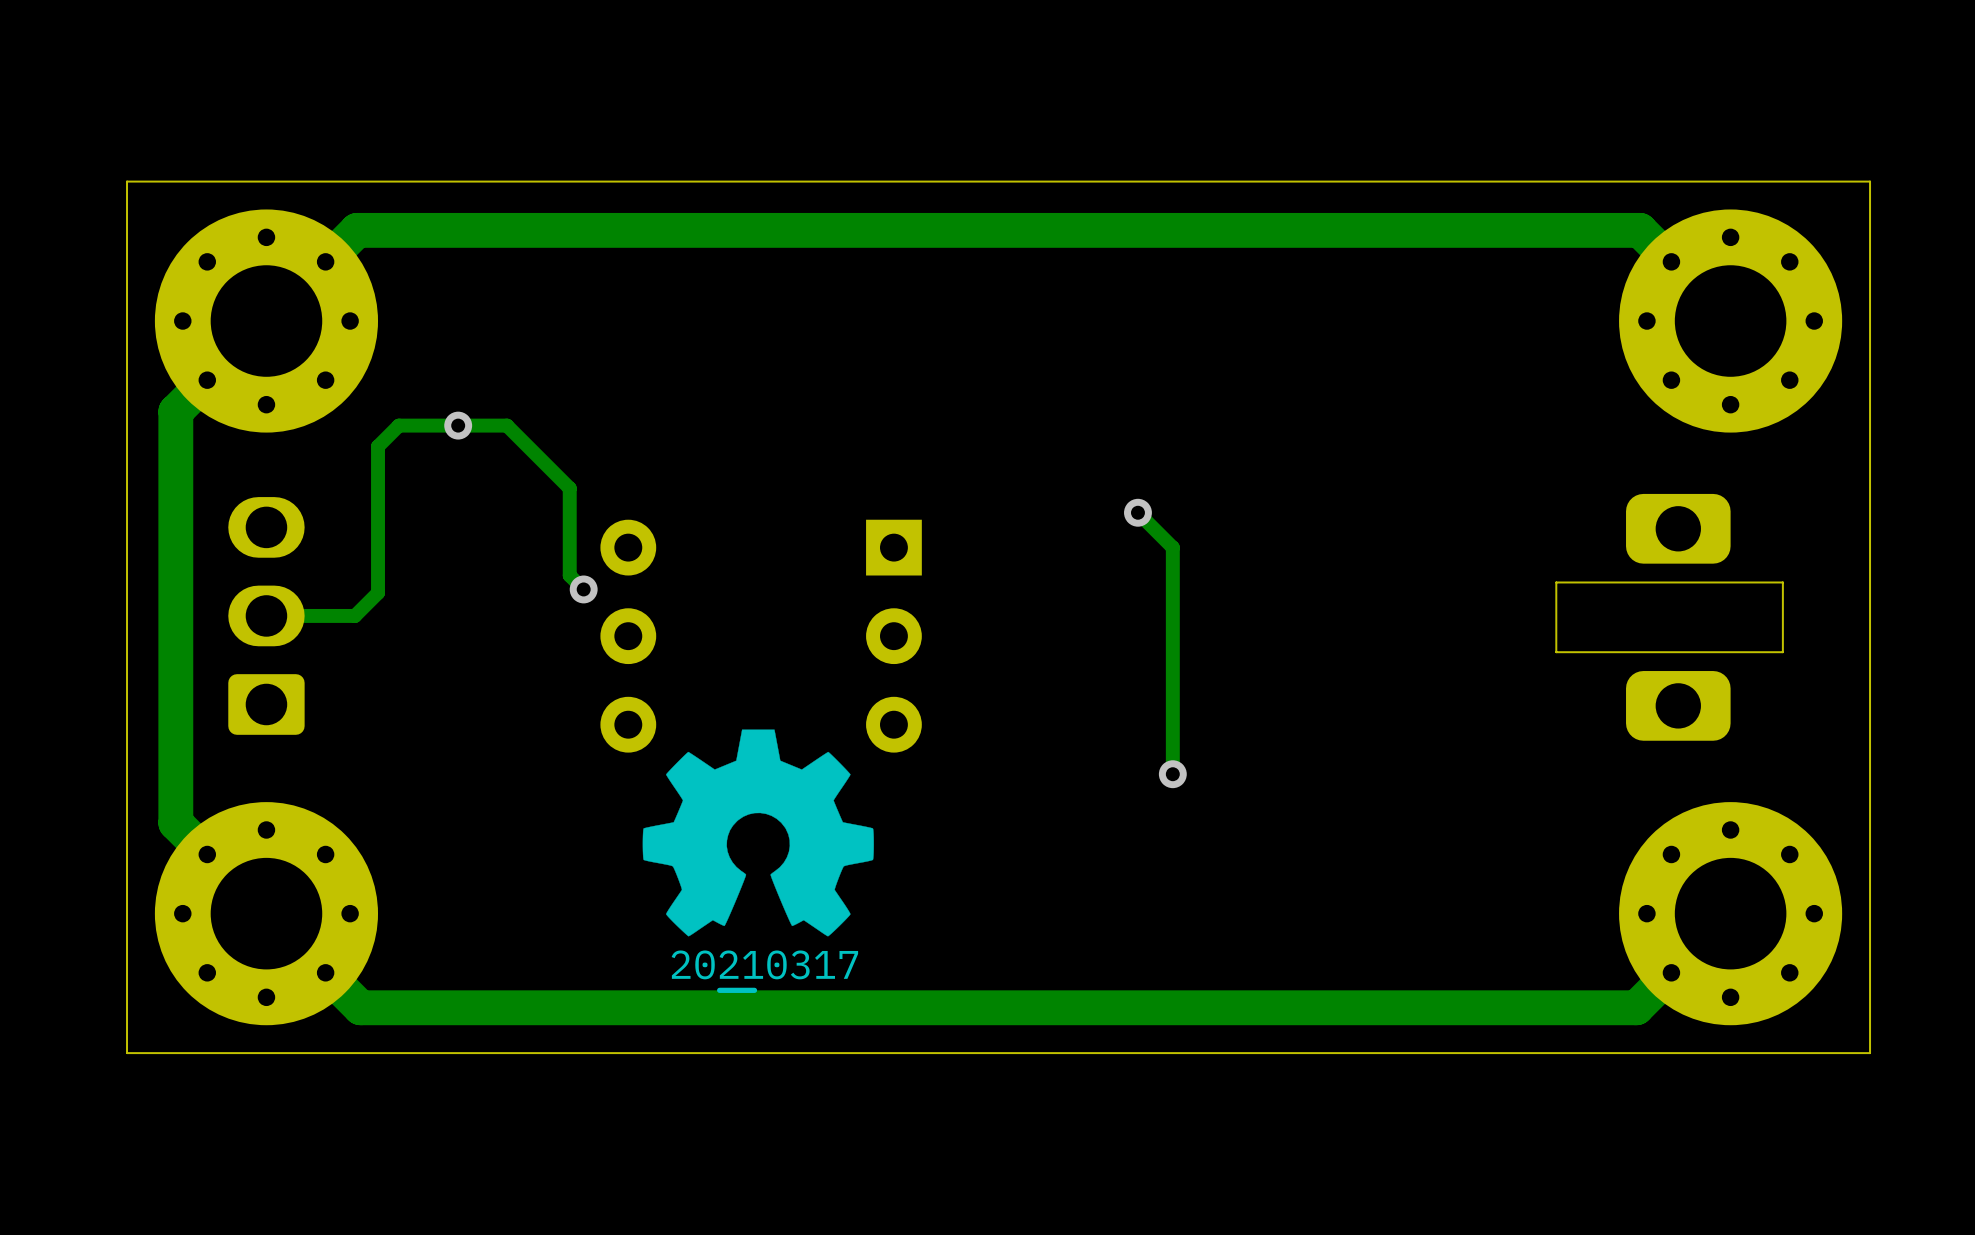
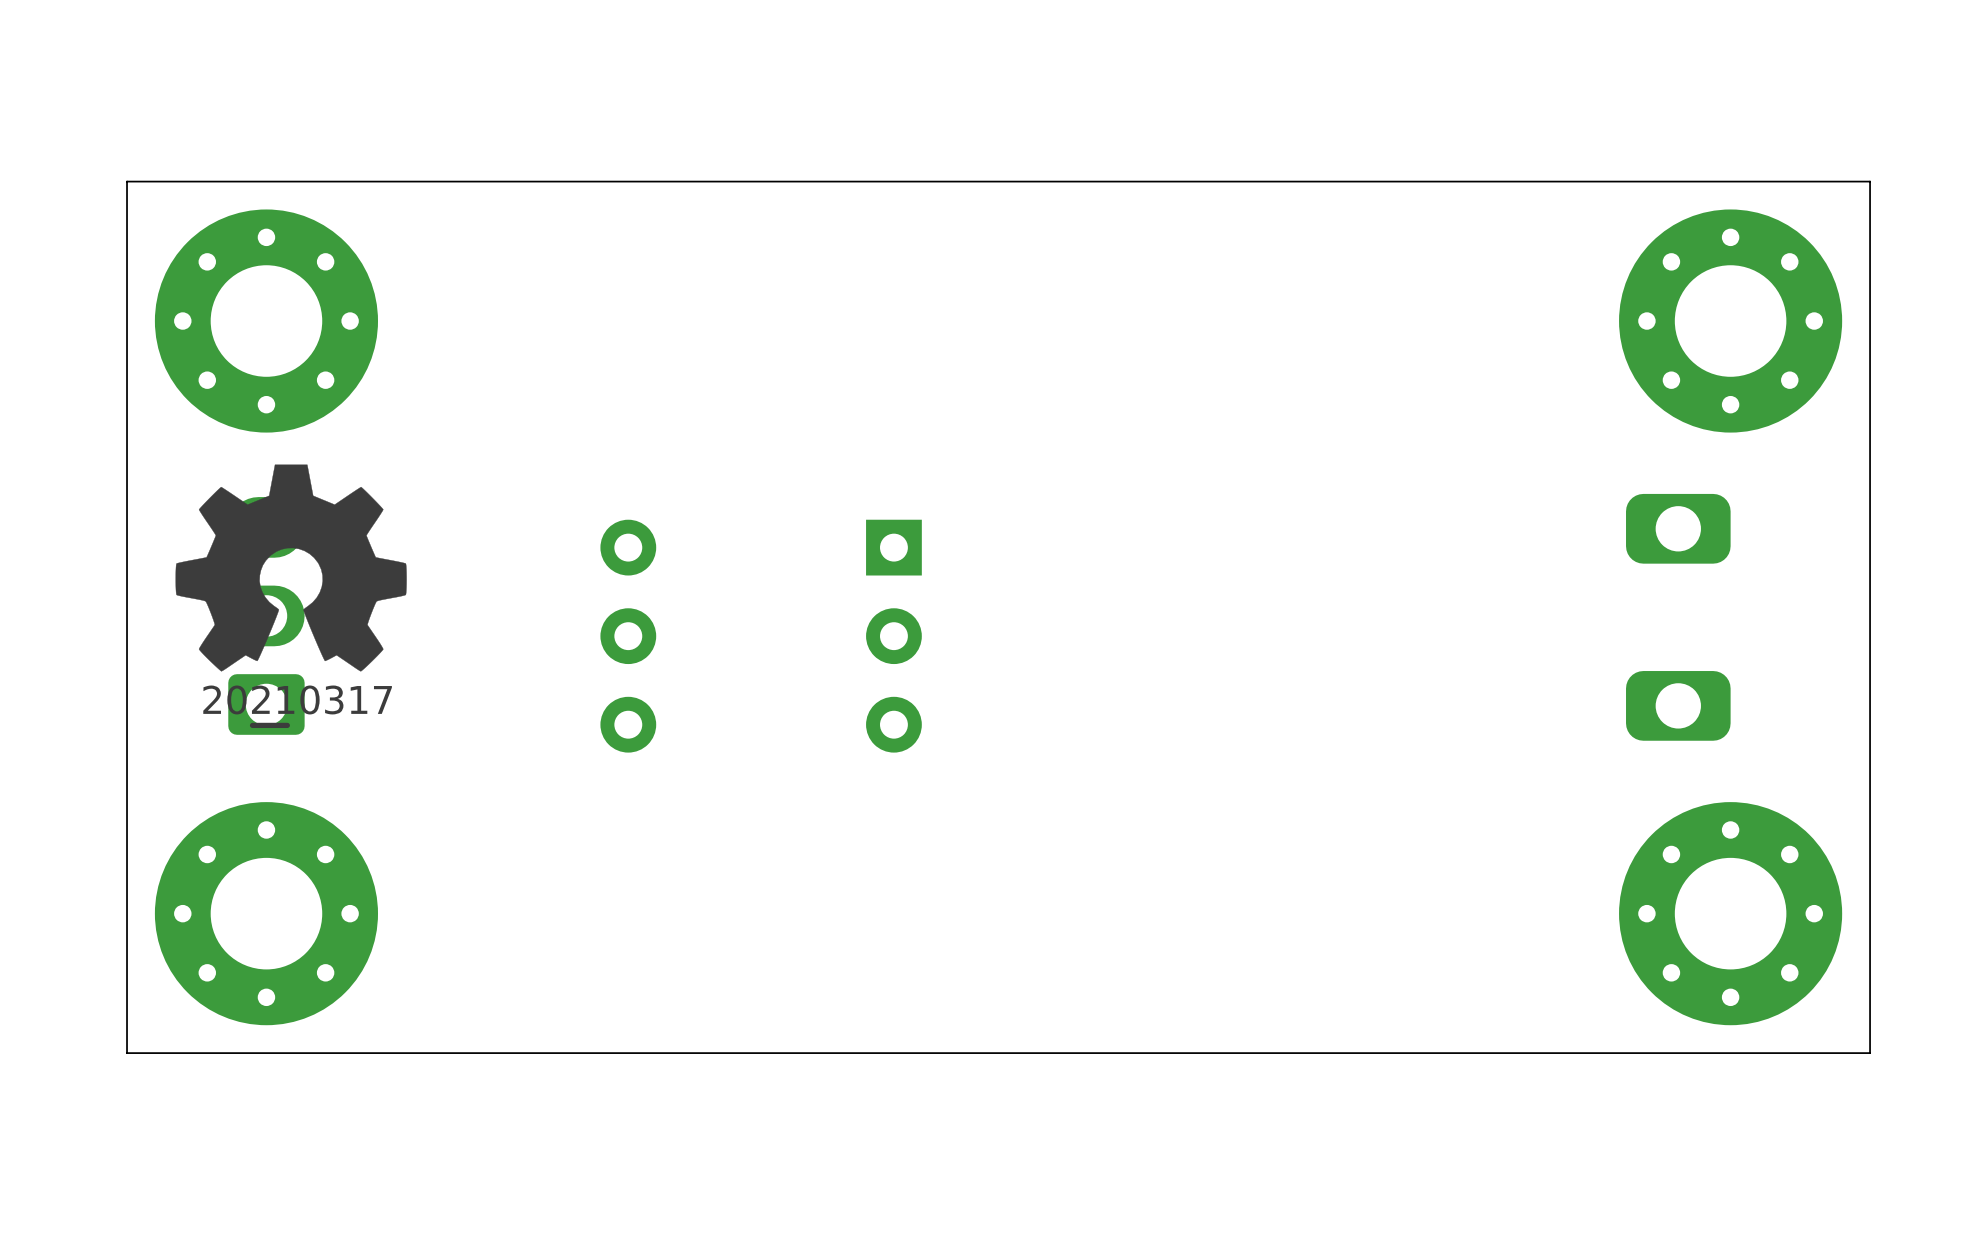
track: (1730, 321) (1639, 230) (357, 230) (175, 411) (175, 823) (360, 1007) (1636, 1007) (1730, 913) -> none
via: (458, 425) -> none
track: (1137, 512) (1172, 547) (1172, 774) -> none
via: (1137, 512) -> none
board edge: (1782, 582) (1782, 652) (1556, 652) (1556, 582) (1782, 582) -> none
track: (583, 589) (569, 575) (569, 488) (506, 425) (398, 425) (378, 446) (378, 592) (355, 615) (266, 615) -> none
via: (583, 589) -> none
via: (1172, 774) -> none
drawing position: (758, 832) -> (291, 568)
drawing position: (737, 990) -> (269, 725)

